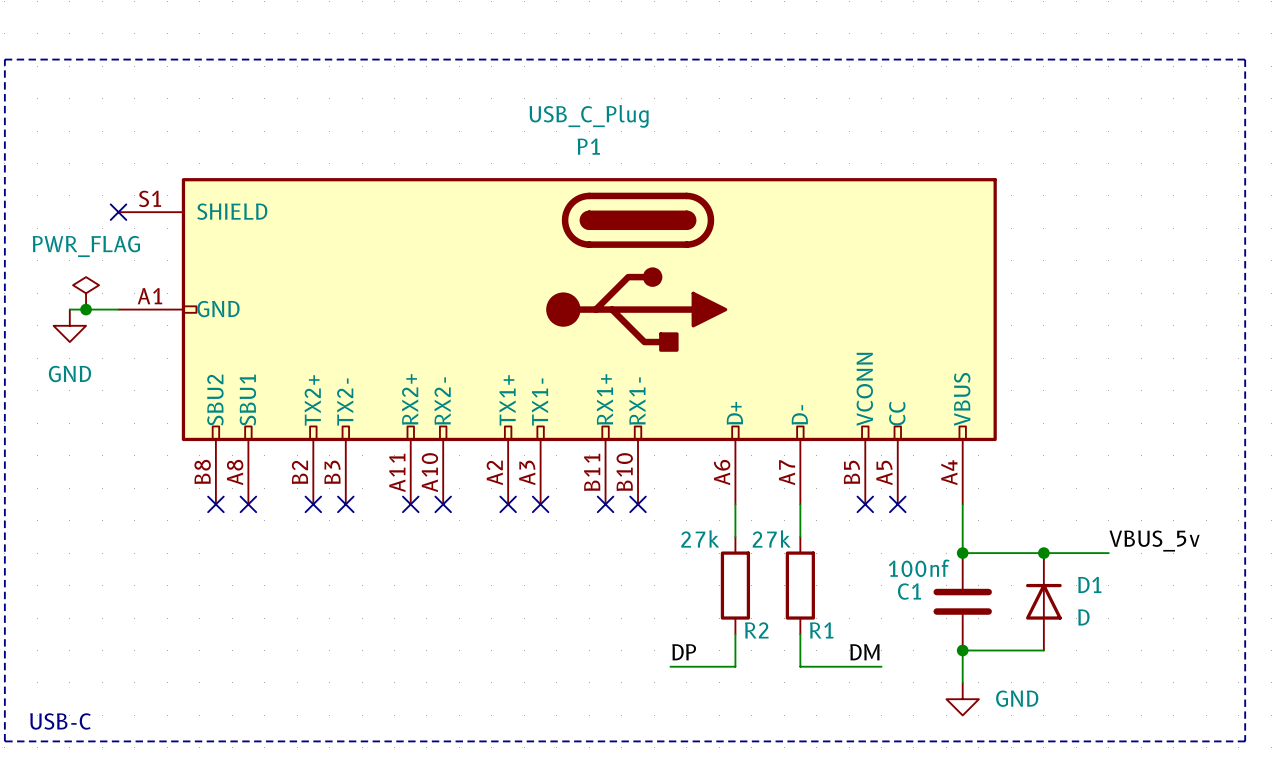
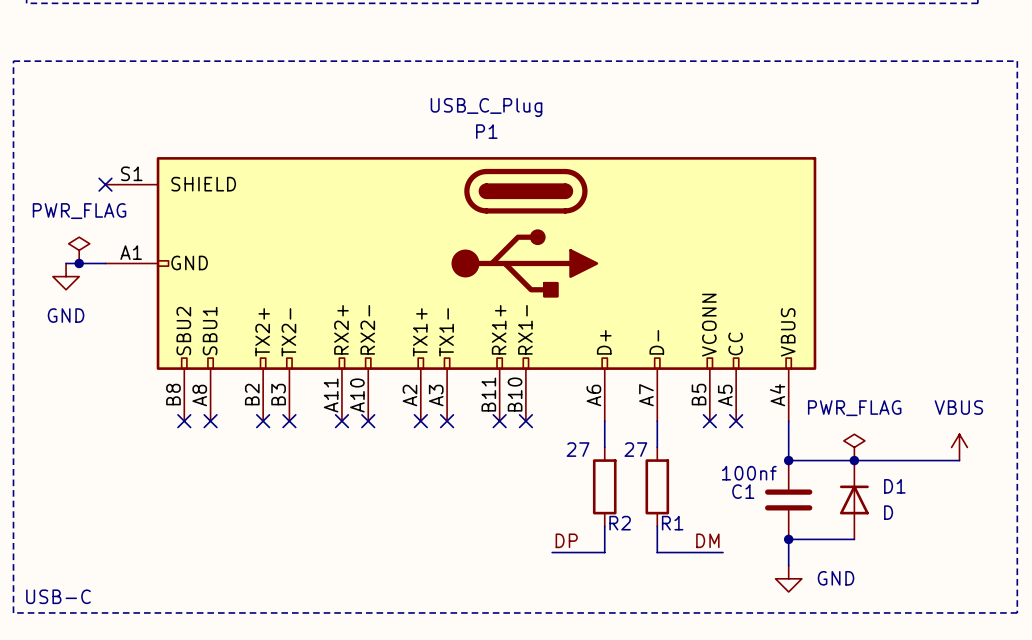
power symbol: none -> PWR_FLAG (854, 447)
power symbol: none -> VBUS (959, 447)
R2 value: 27k (700, 538) -> 27 (578, 449)
R1 value: 27k (771, 538) -> 27 (635, 449)
label: VBUS_5v (1154, 541) -> none
wire: none -> (906, 460) (959, 460)

